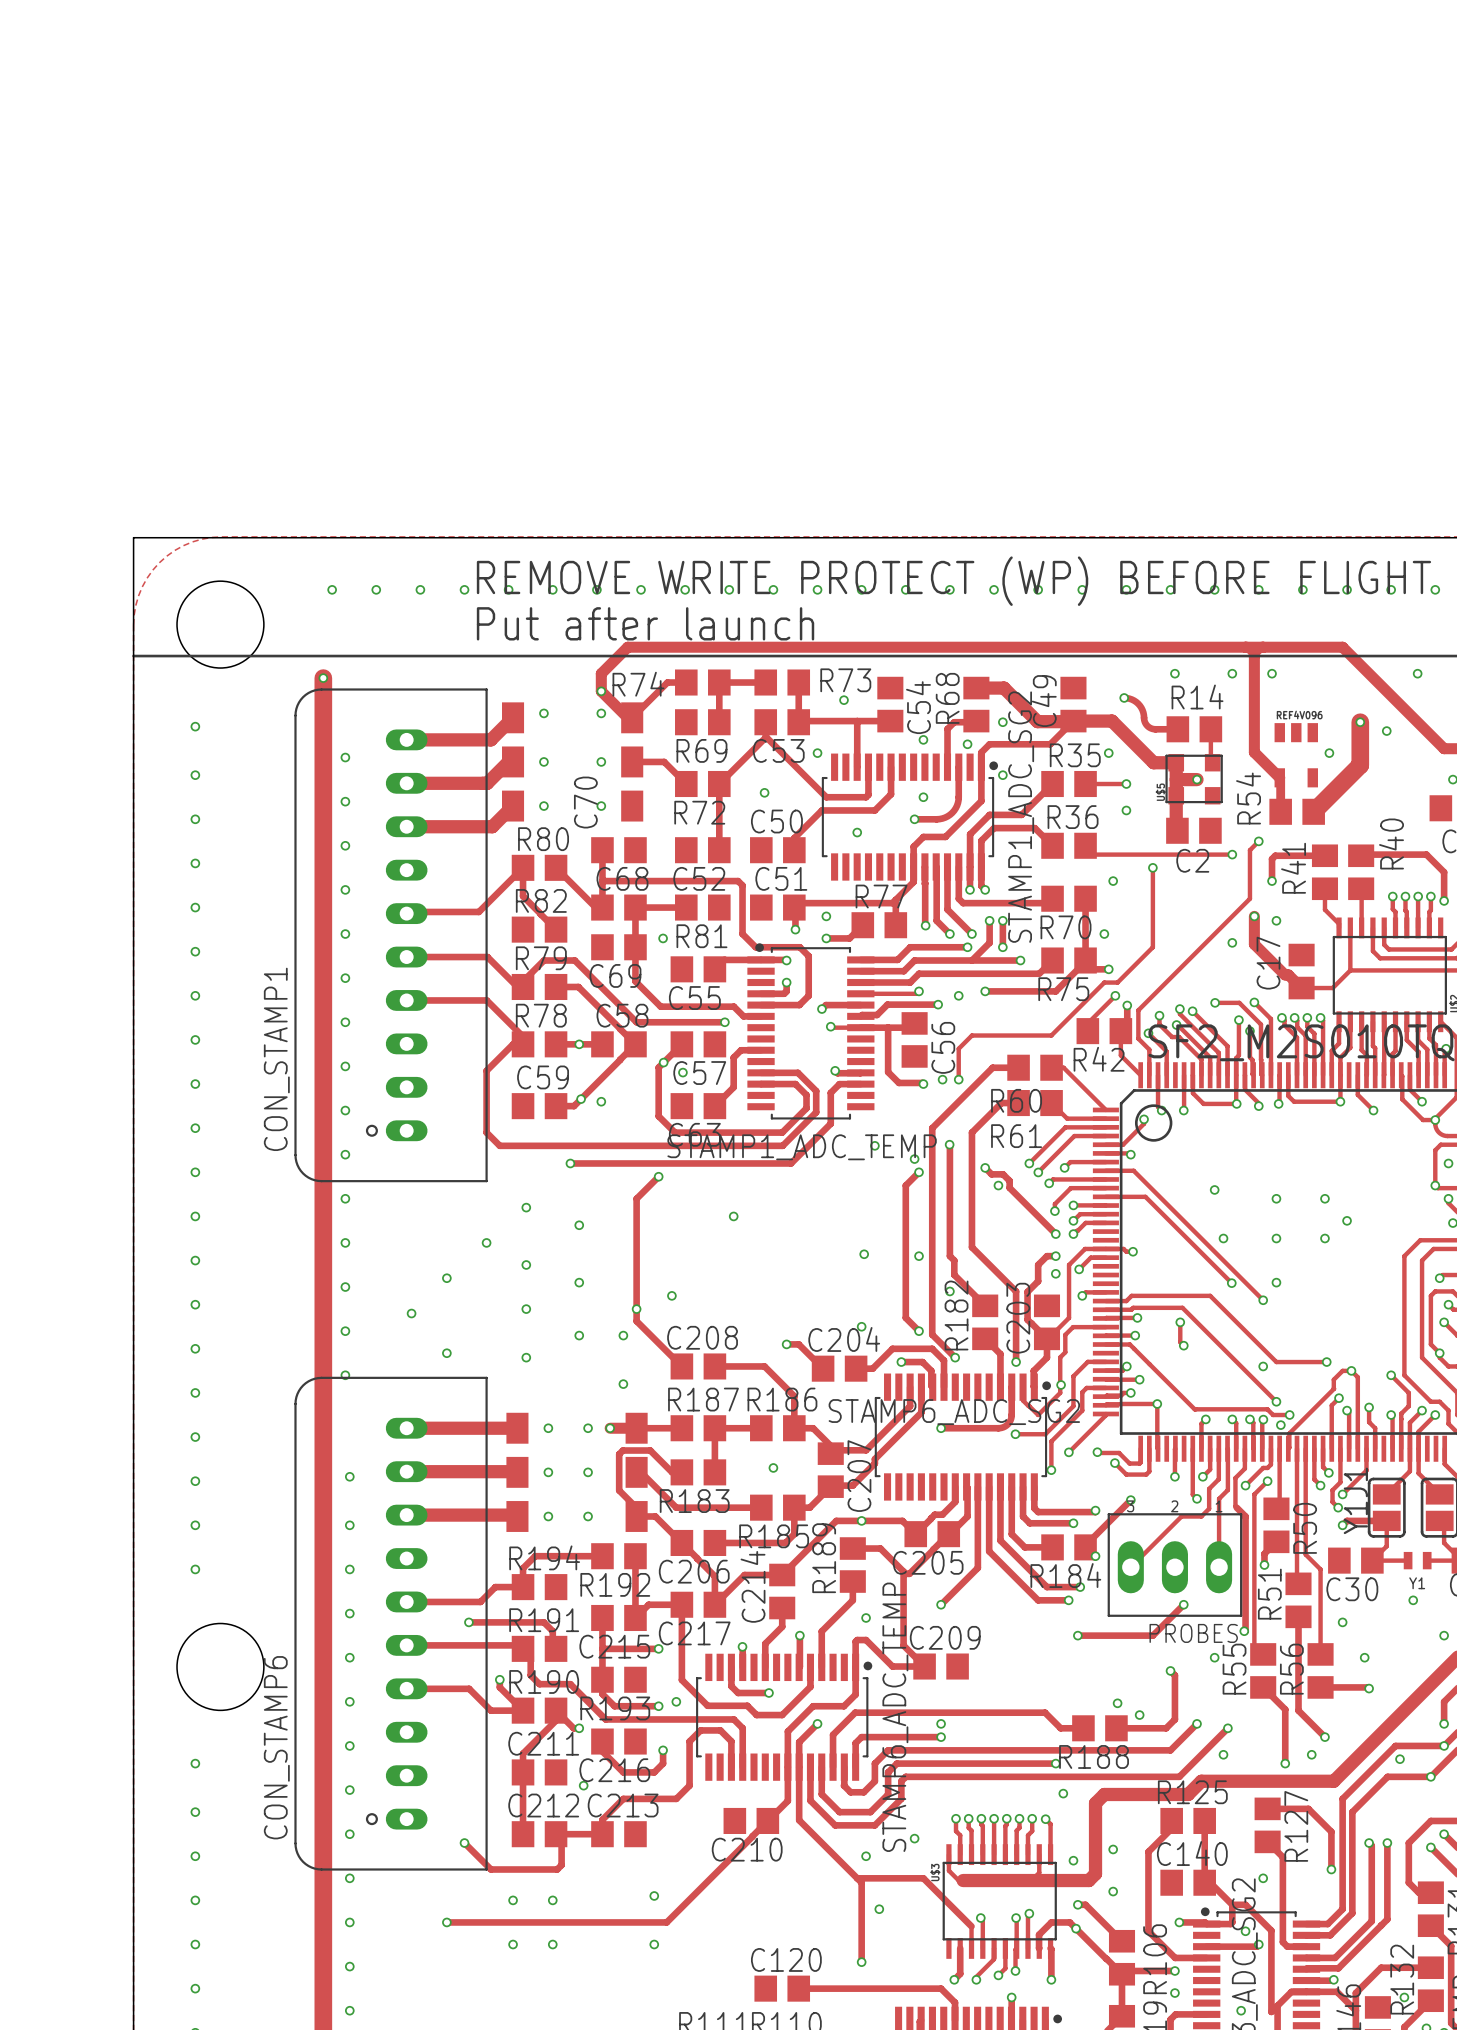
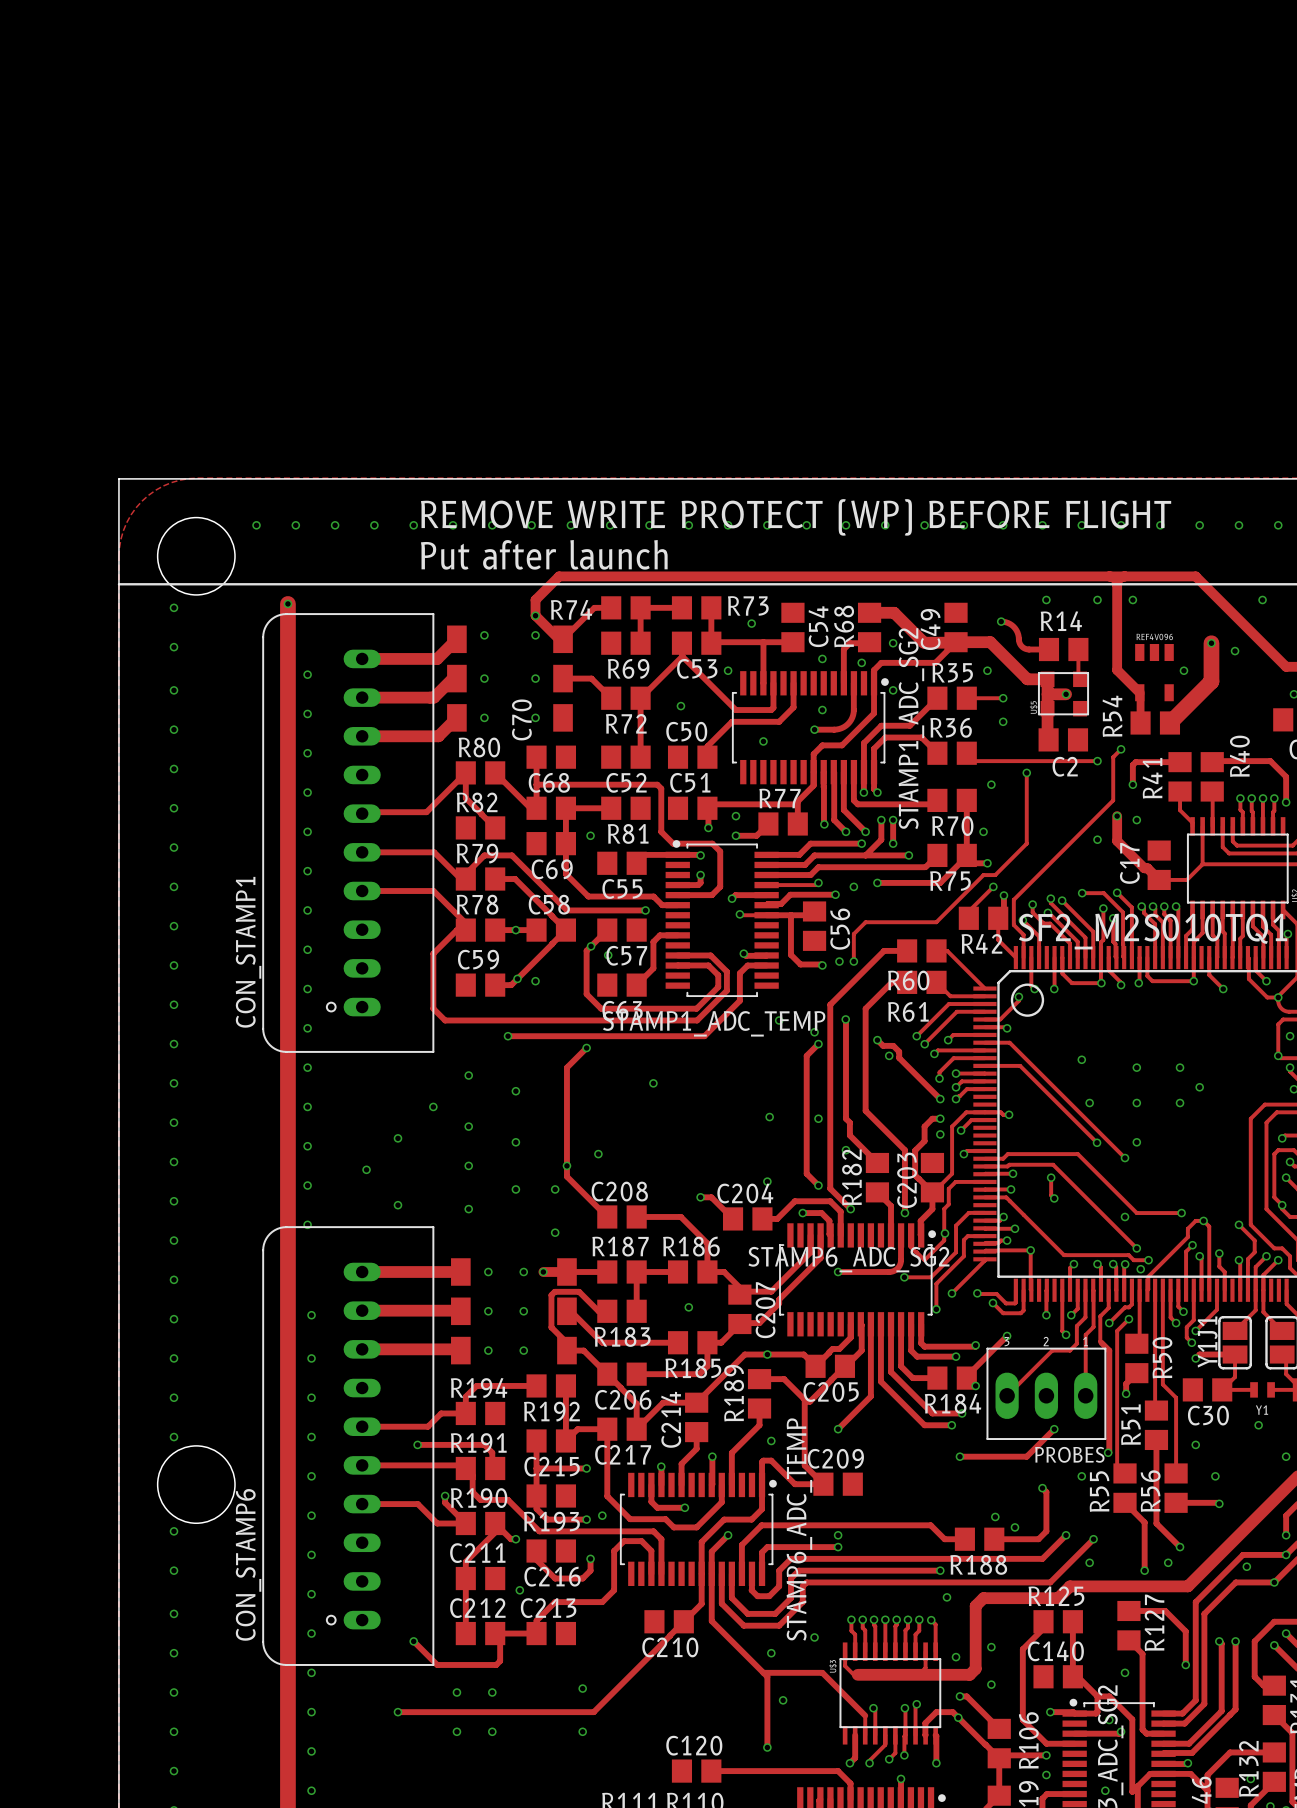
via: none -> (256, 525)
via: none -> (173, 607)
via: none -> (173, 1437)
via: none -> (173, 1531)

